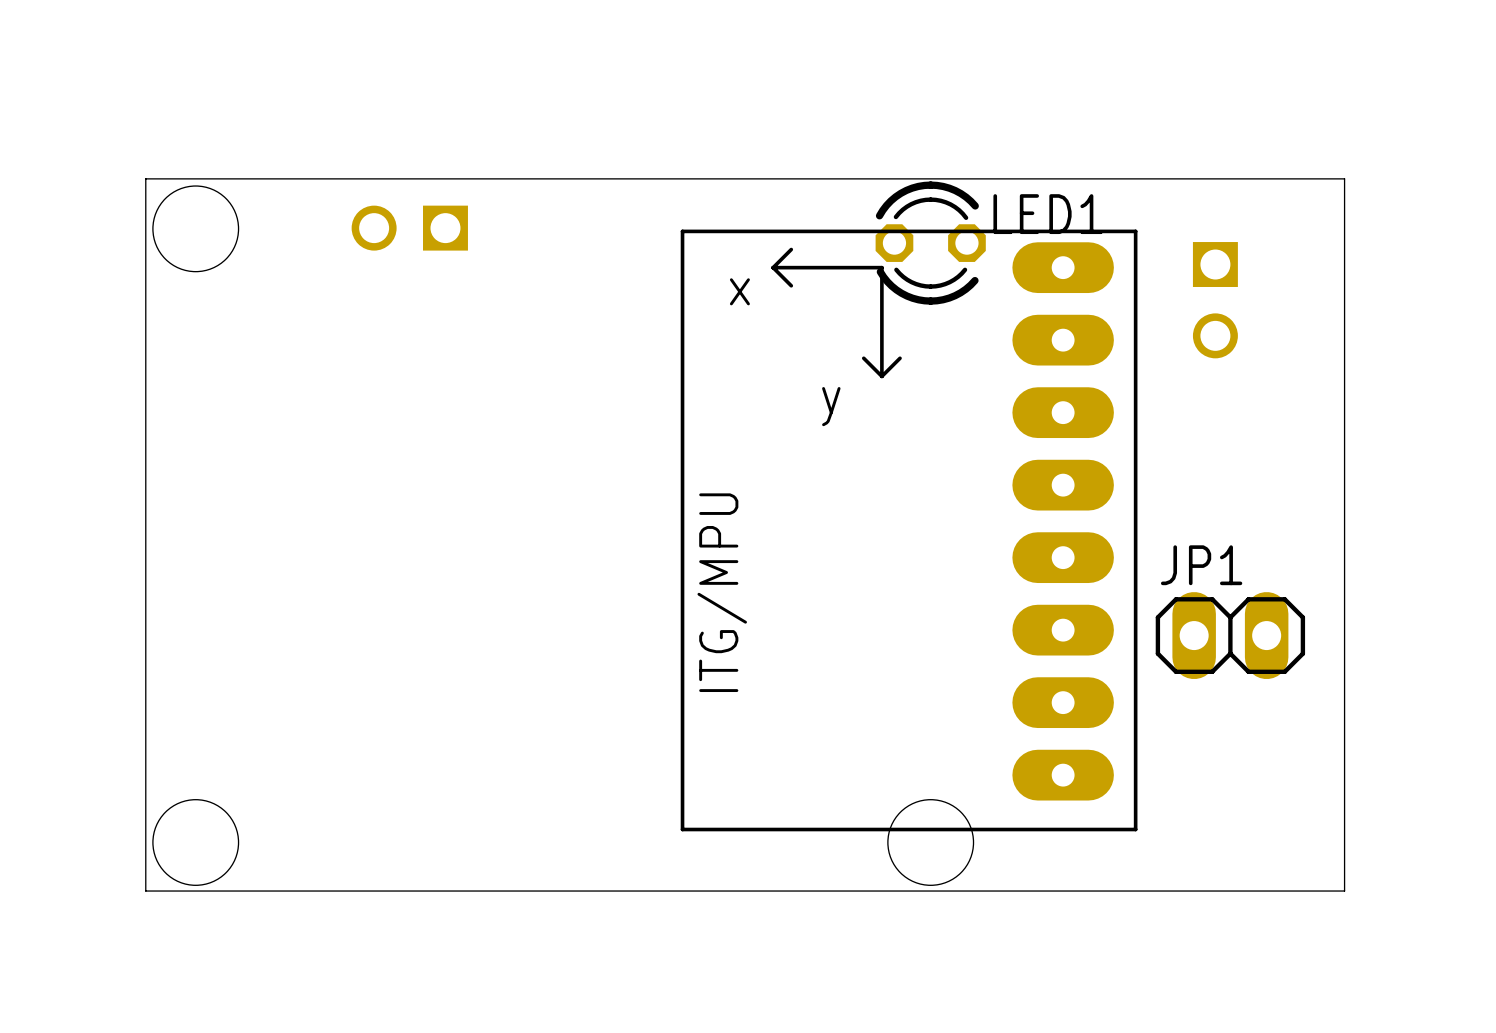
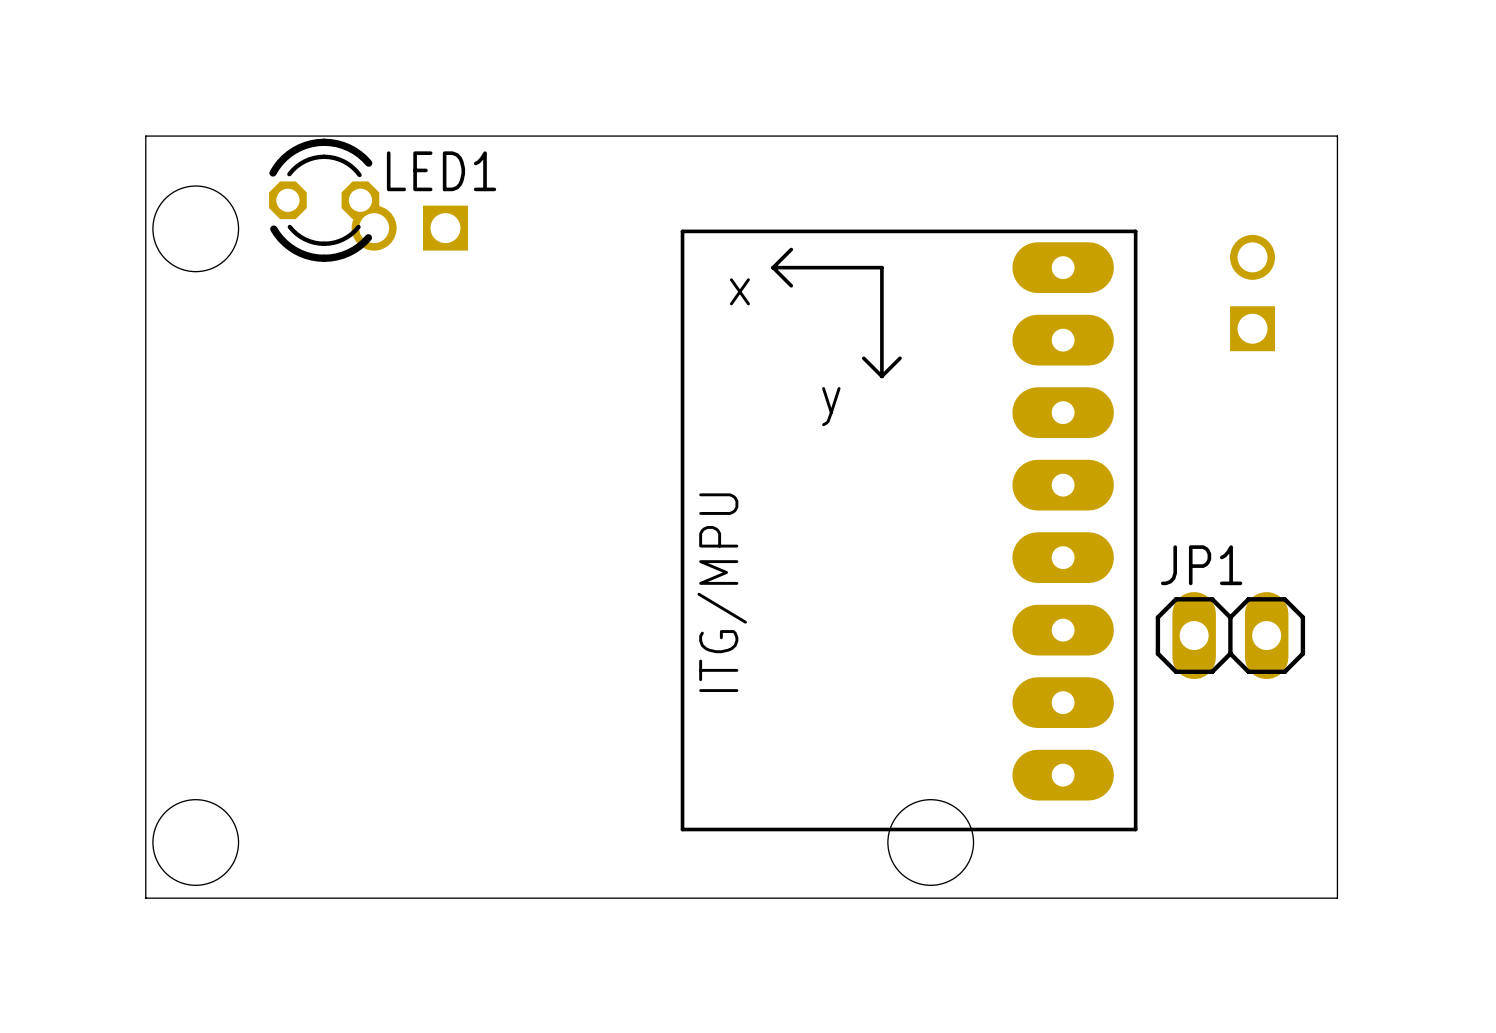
board edge: (145, 178) (1344, 178) (1344, 891) (145, 891) -> (145, 178) (145, 136) (1337, 136) (1337, 898) (145, 898) (145, 891)
LED1 position: (930, 243) -> (324, 200)
part rotation: 0° (1215, 300) -> 180° (1252, 293)

